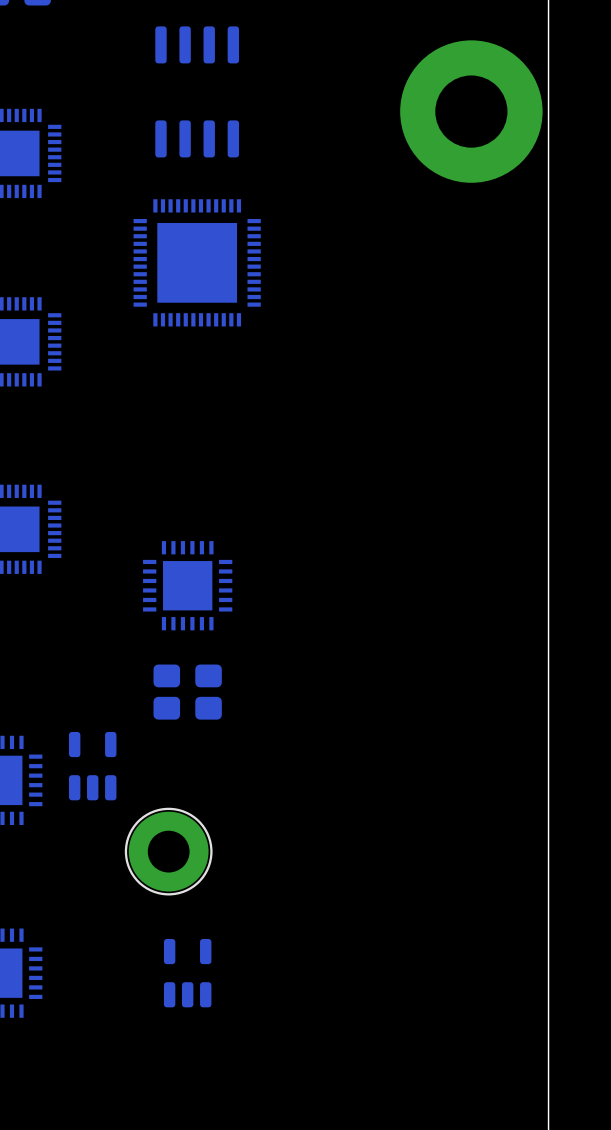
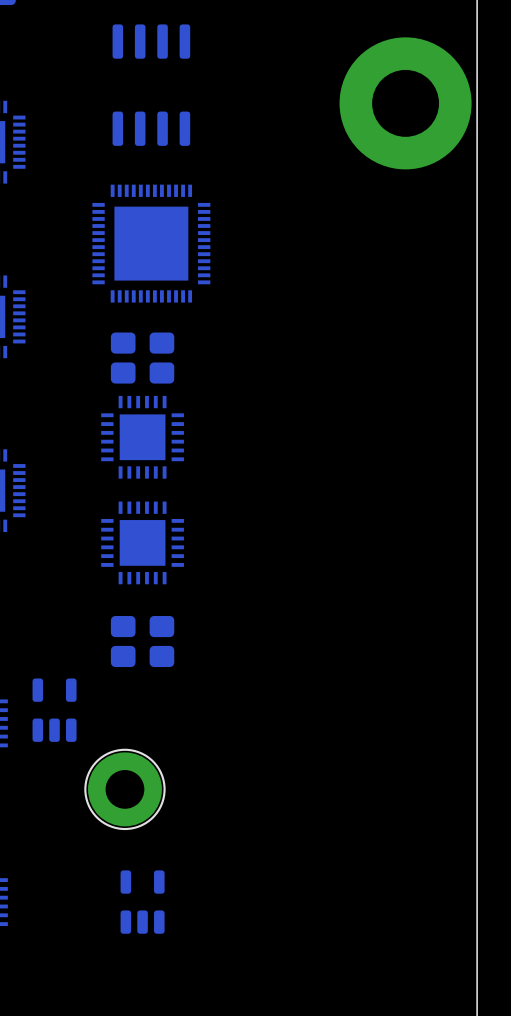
part: none -> (142, 358)
part: none -> (142, 437)

